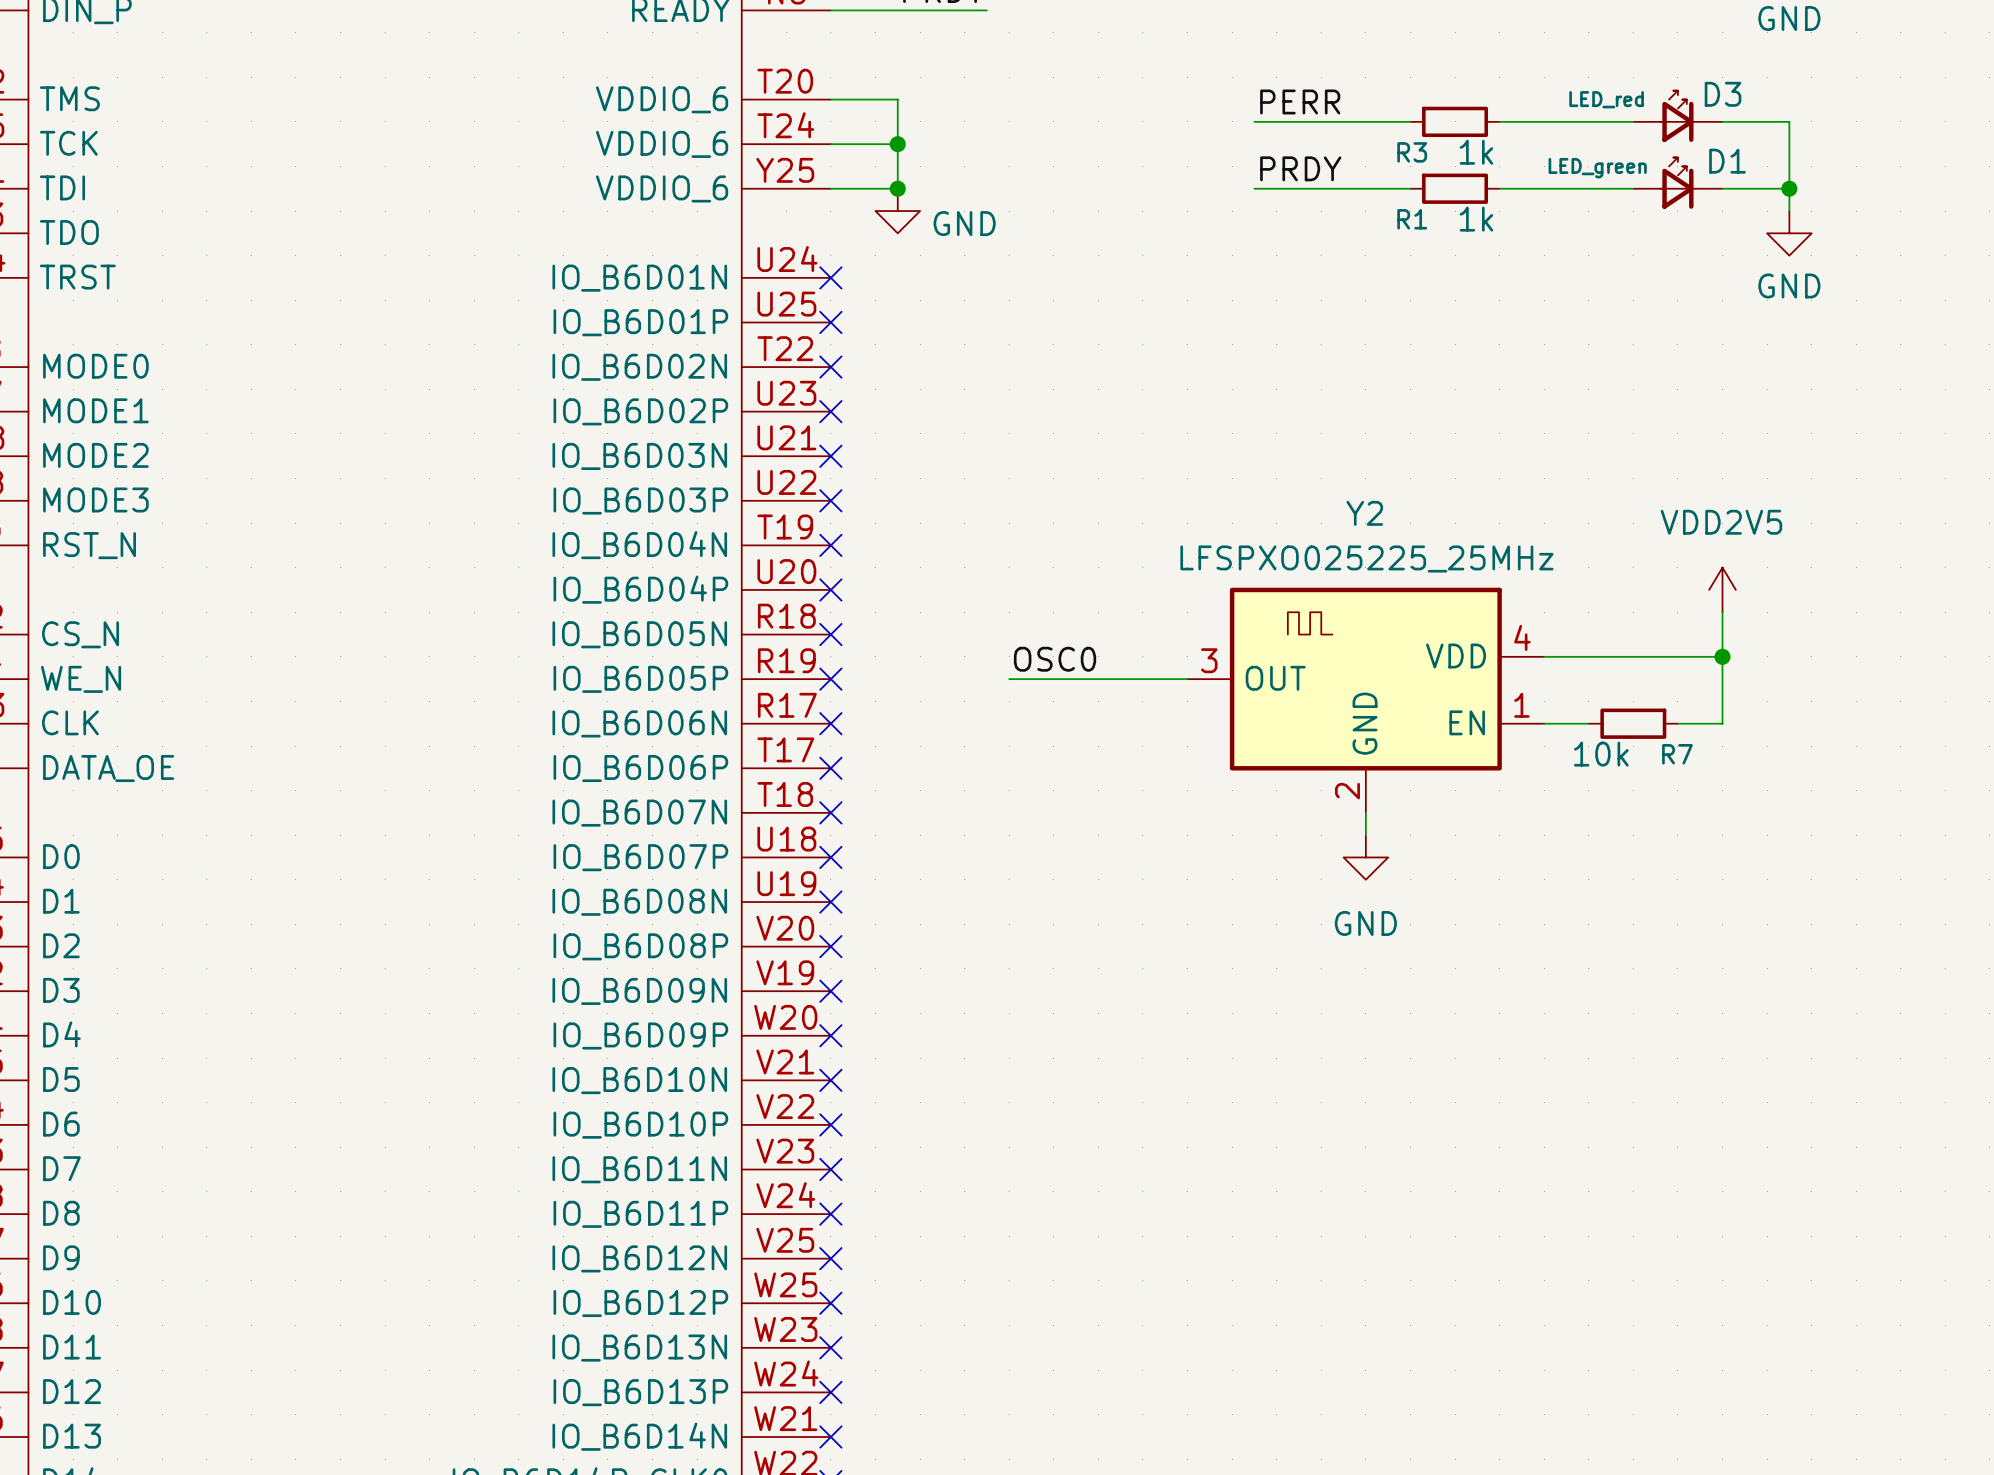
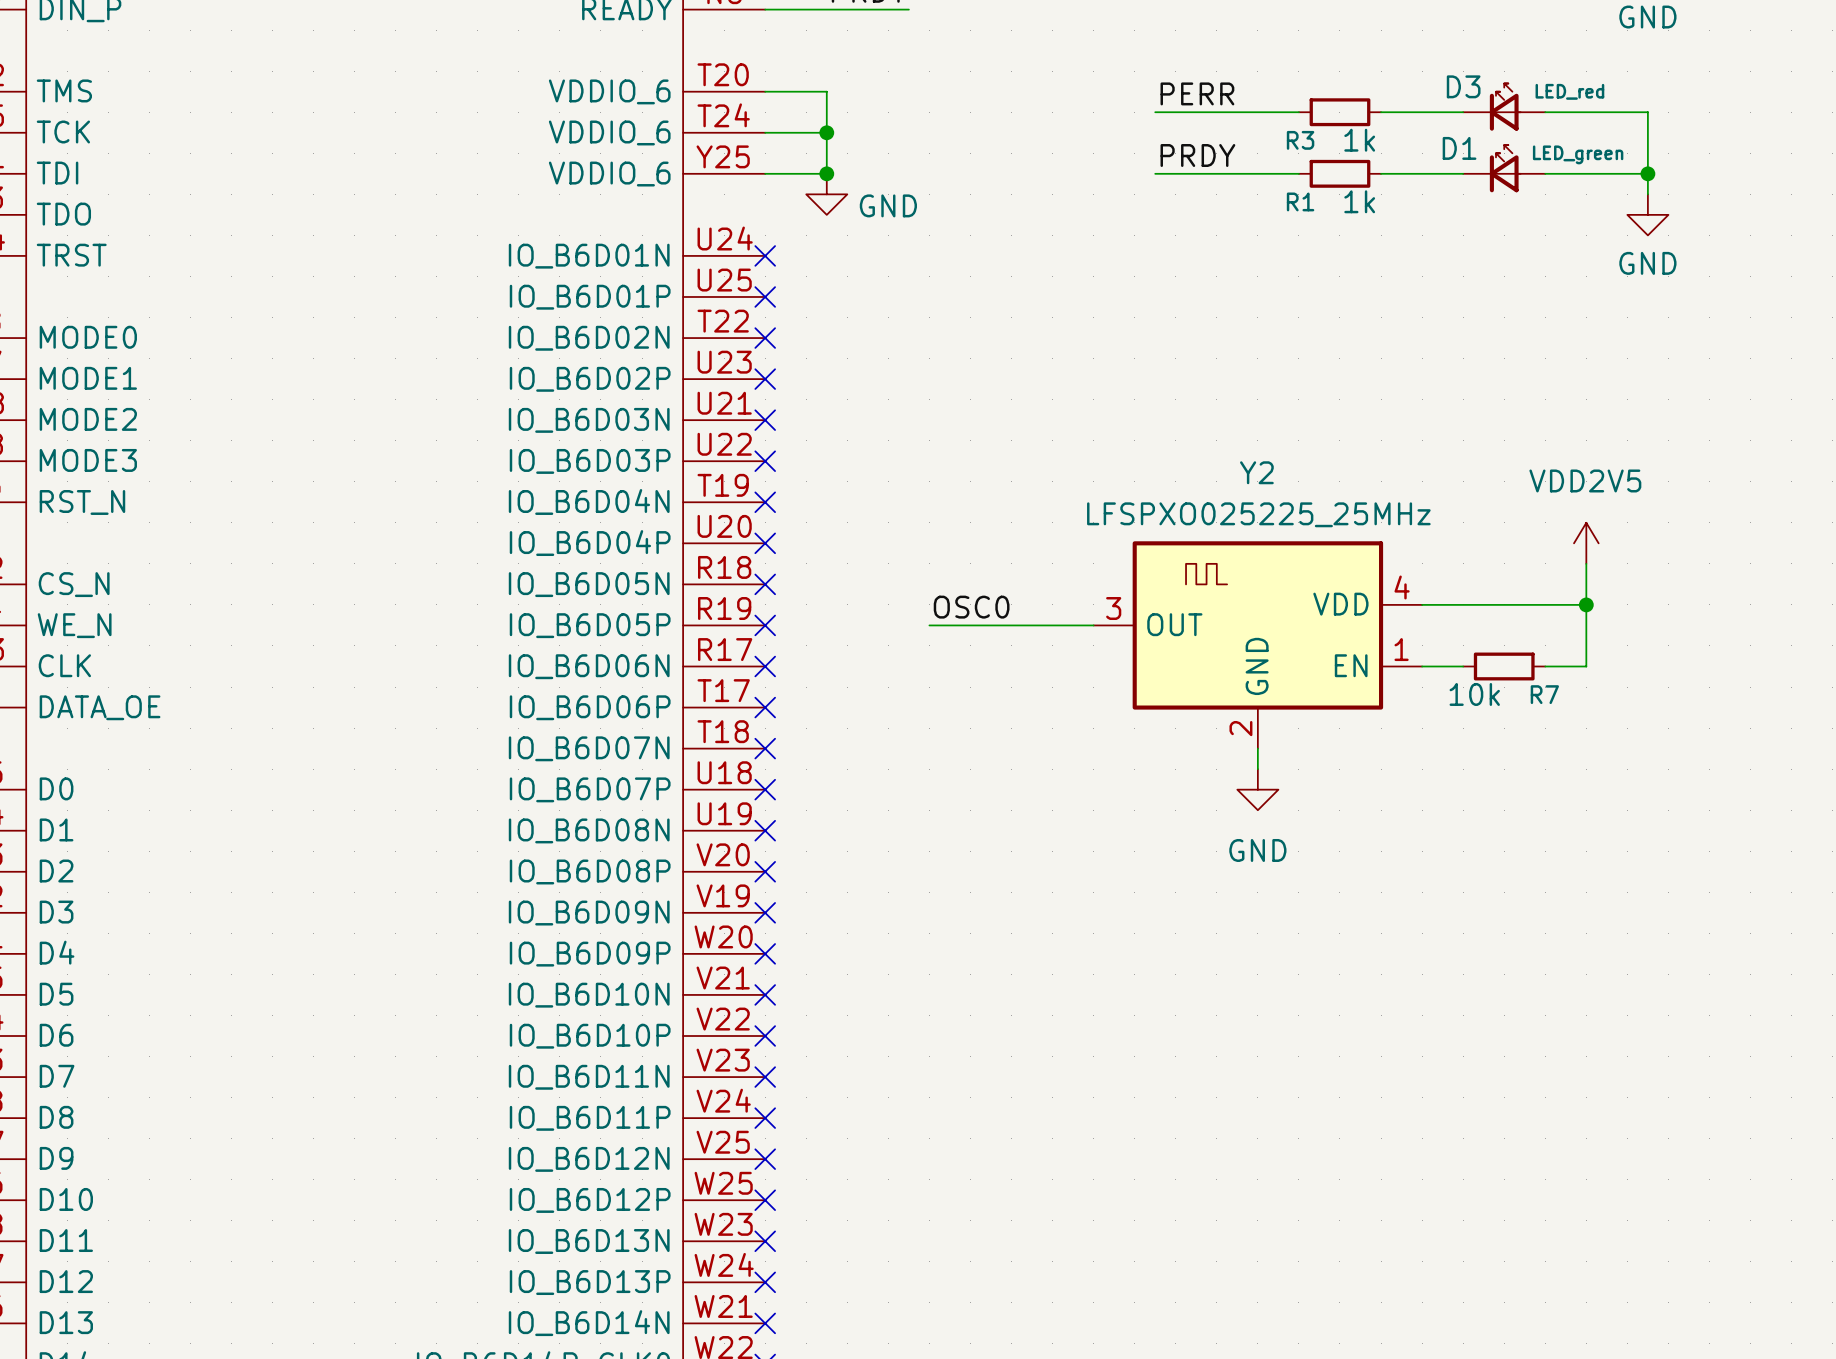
D3 flip: as is (1676, 116) -> left-right (1505, 107)
D1 flip: as is (1676, 183) -> left-right (1505, 168)

